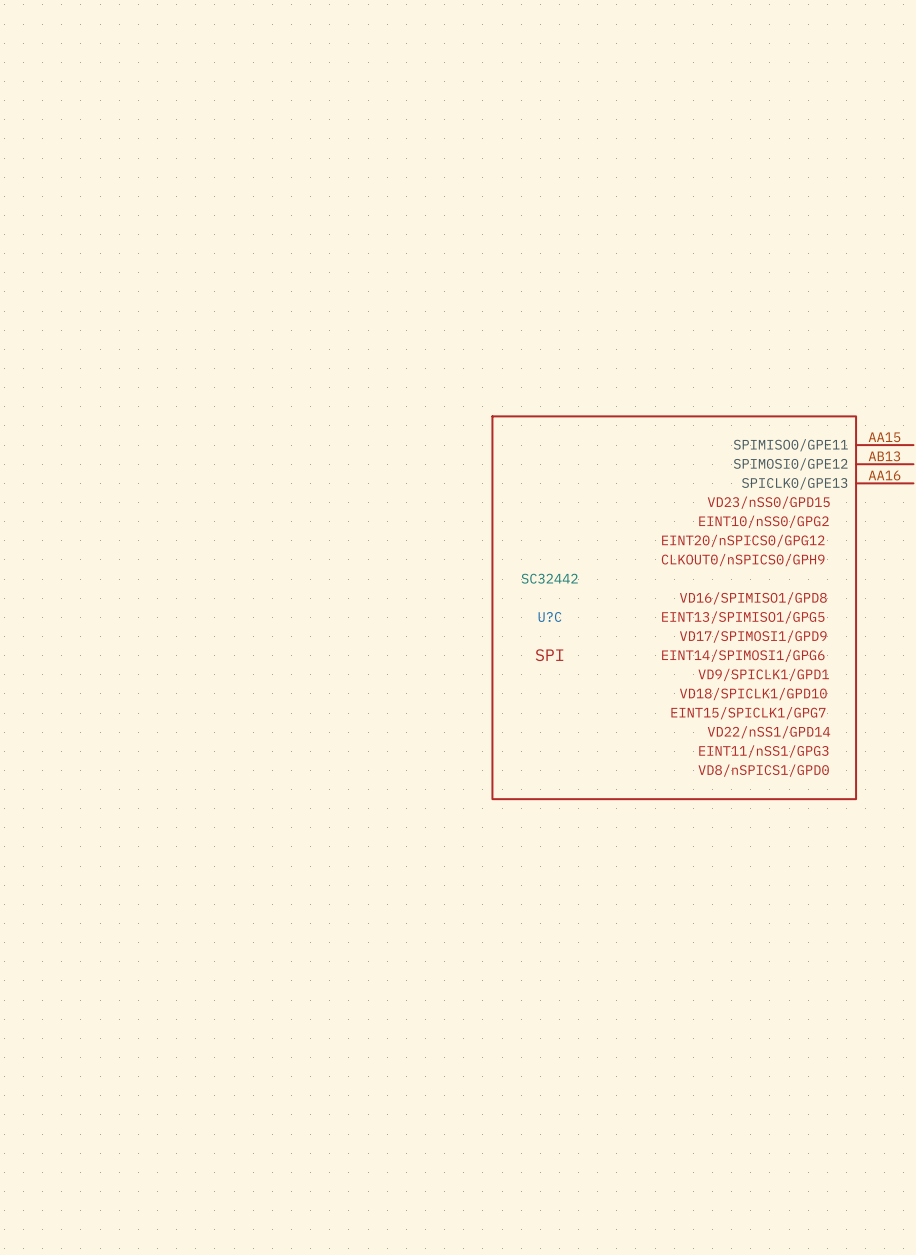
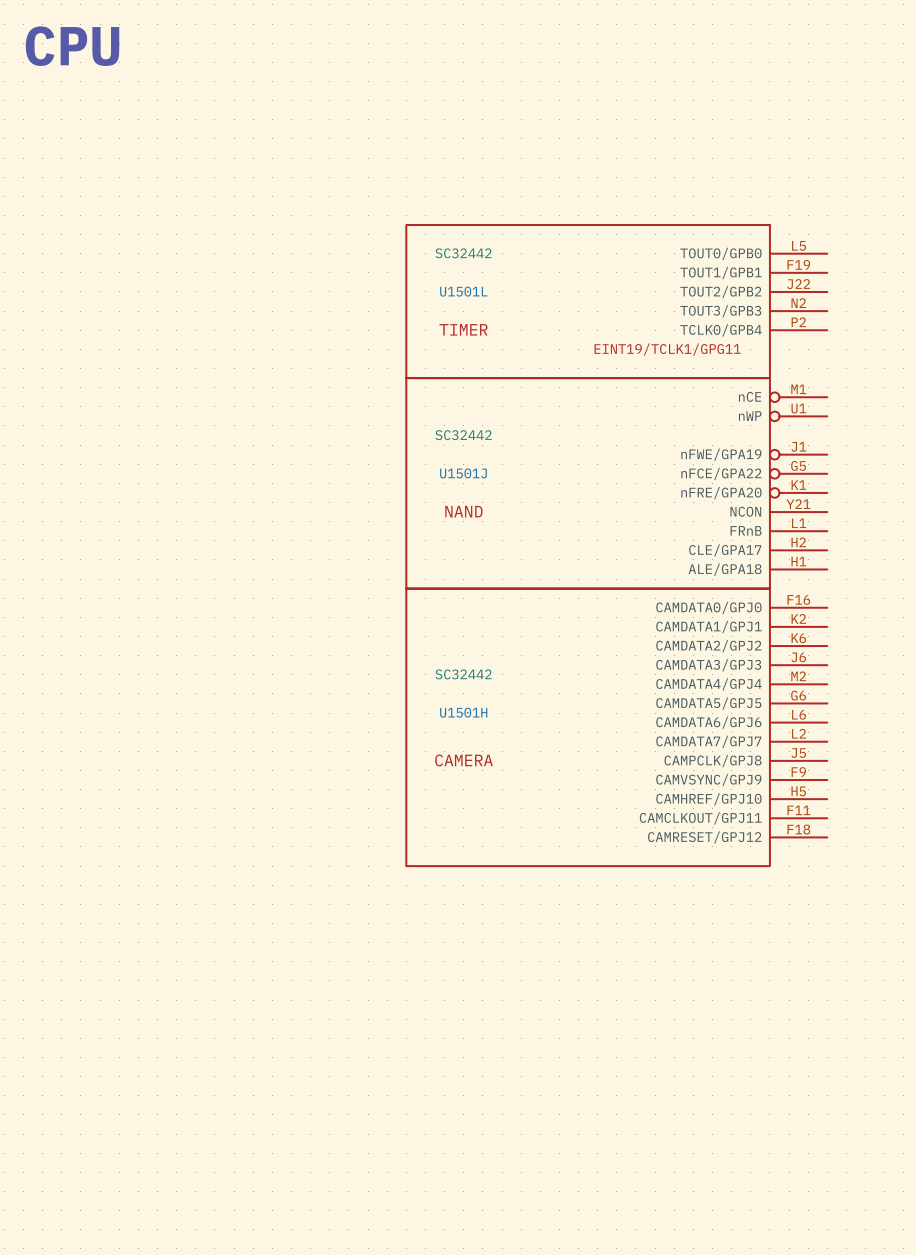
text: none -> CPU (72, 46)
U1501L: none -> SC32442 (616, 301)
U1501J: none -> SC32442 (616, 483)
U?C: SC32442 (702, 607) -> none
U1501H: none -> SC32442 (616, 727)

